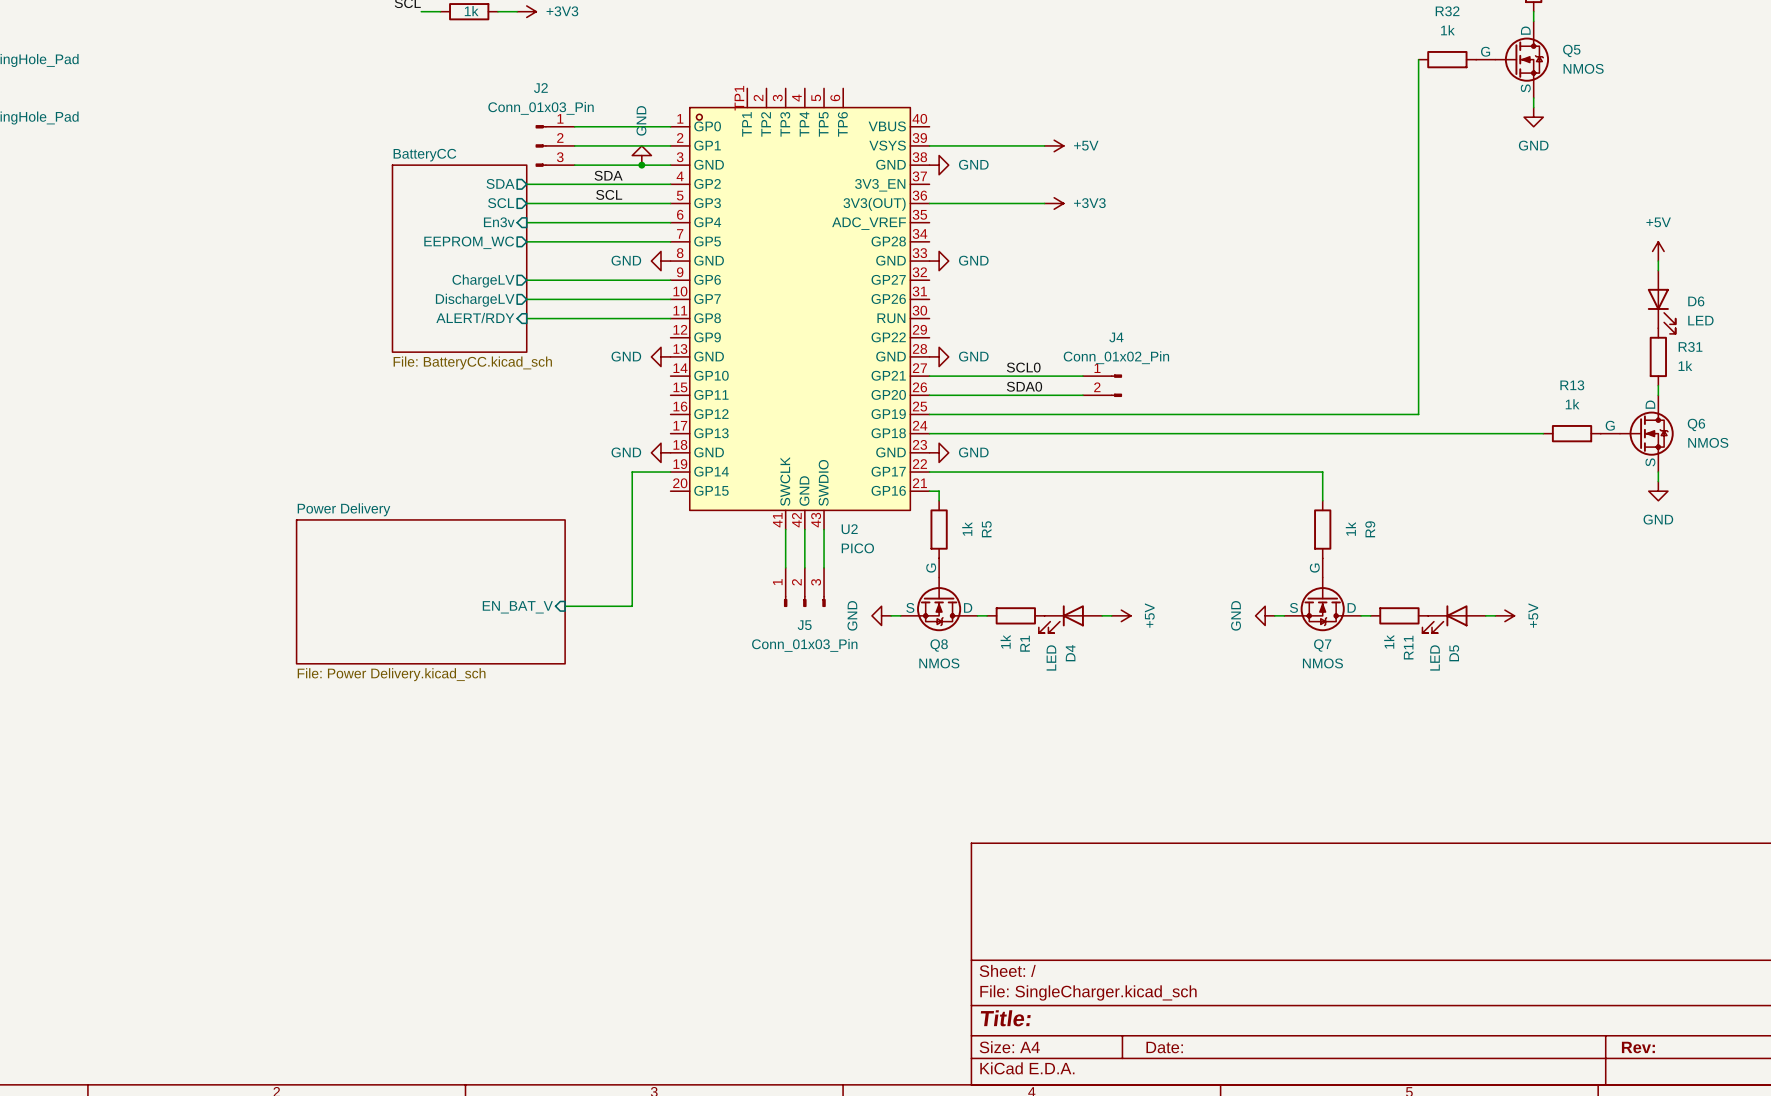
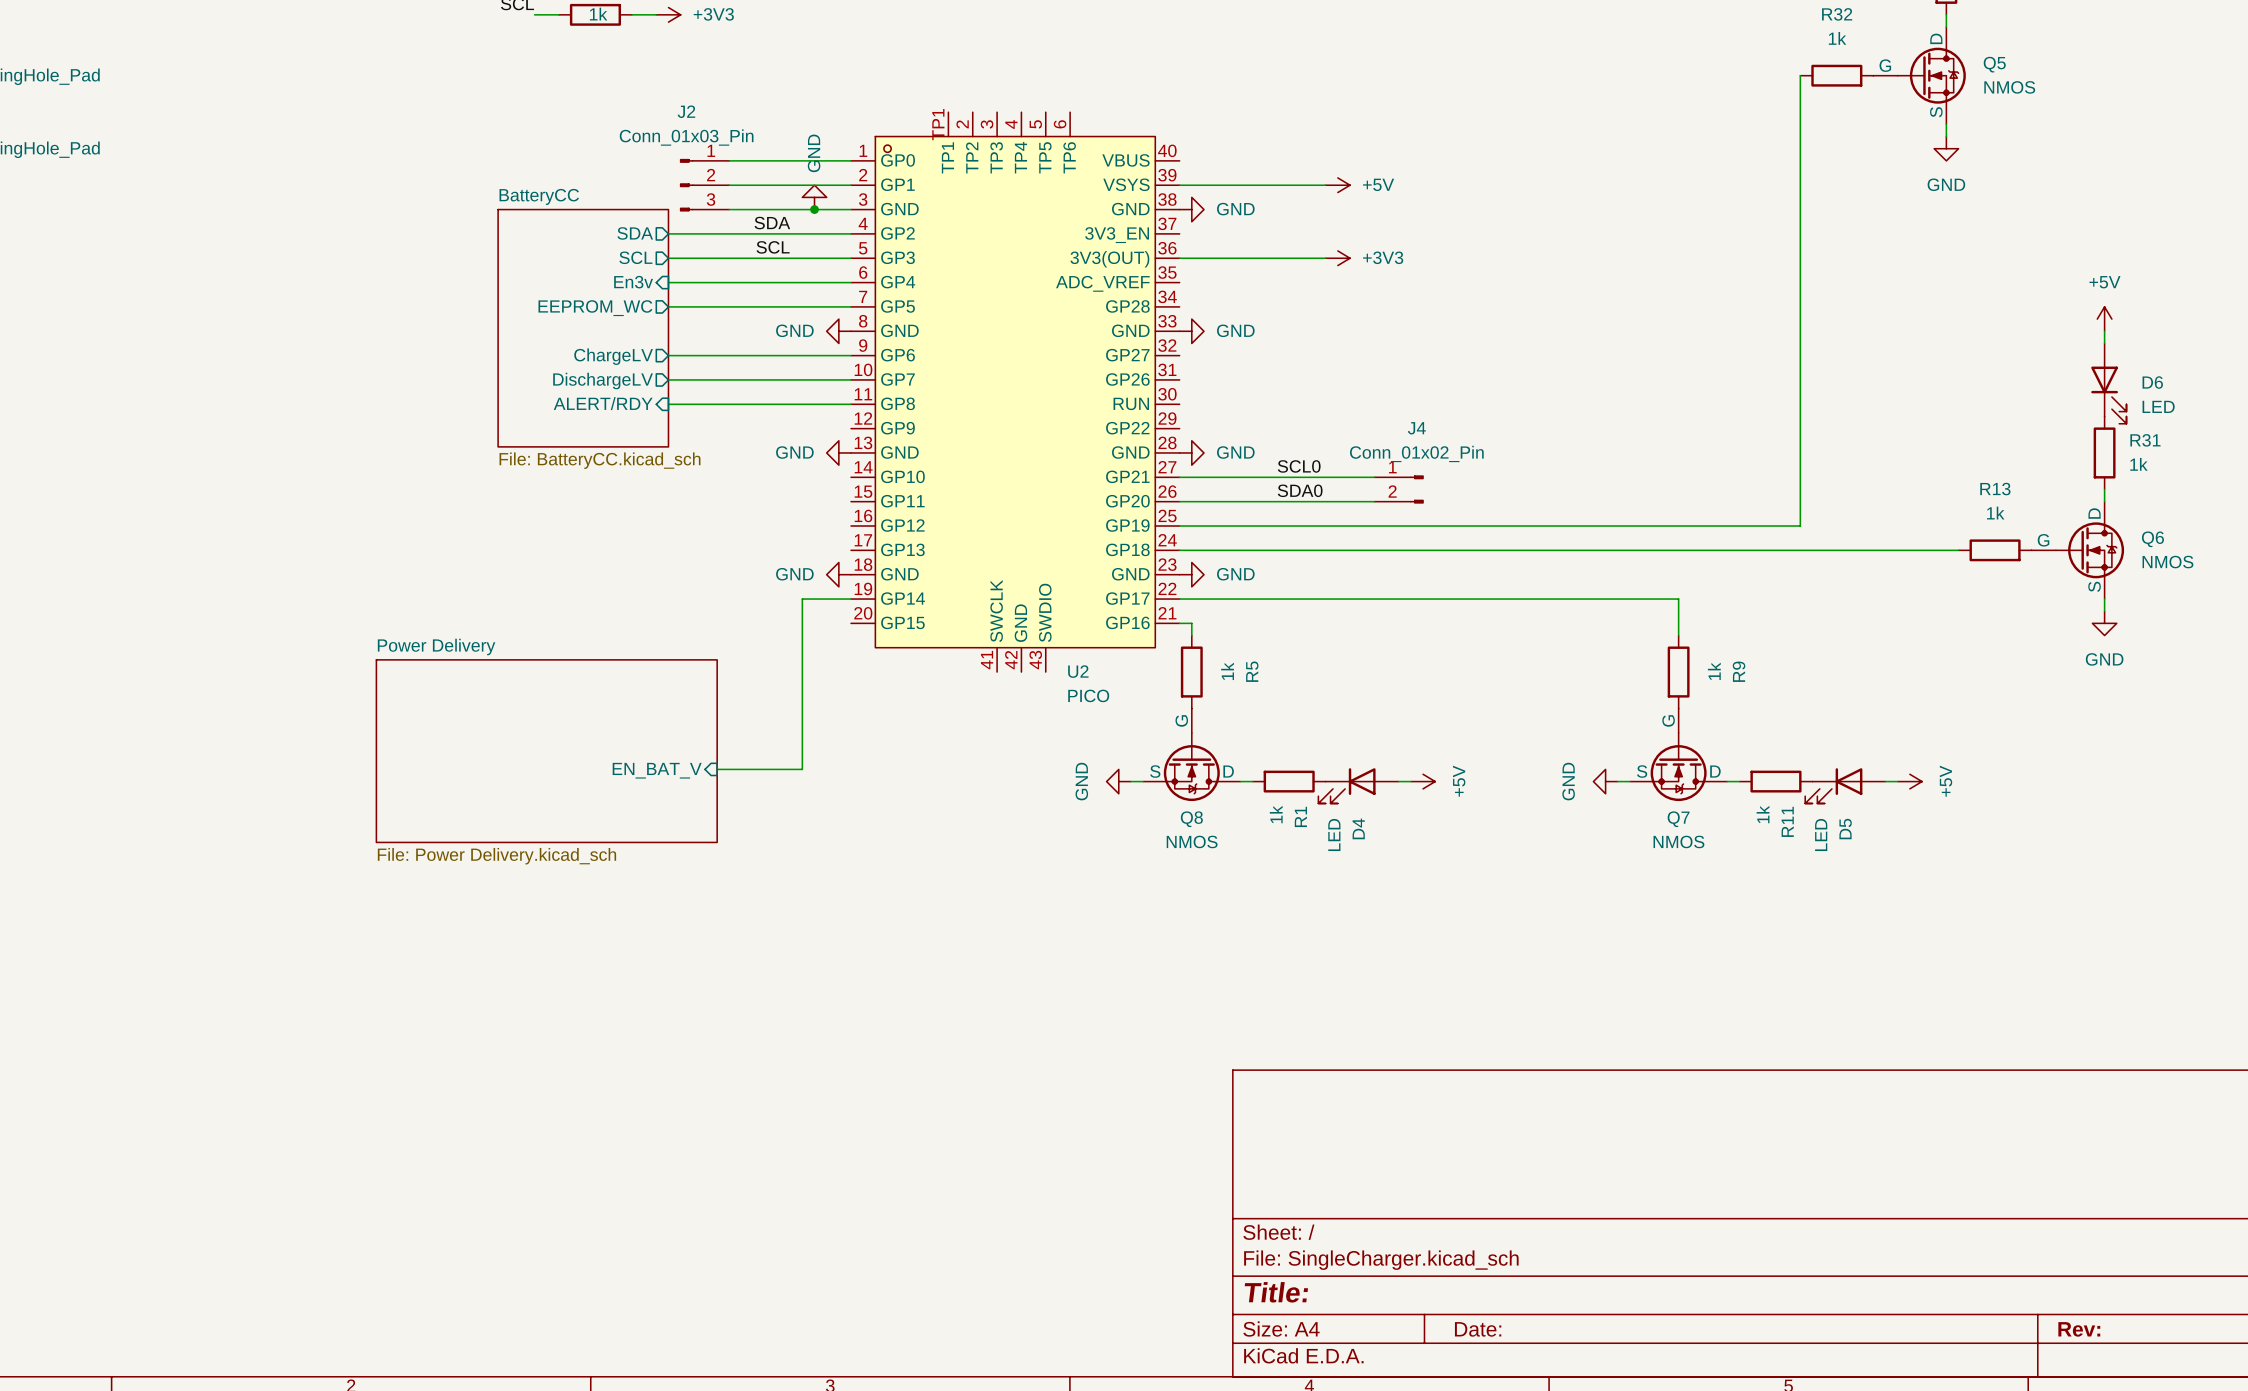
wire: (785, 529) (785, 567) -> none
wire: (804, 529) (804, 567) -> none
wire: (824, 529) (824, 567) -> none
J5: Conn_01x03_Pin (804, 587) -> none

